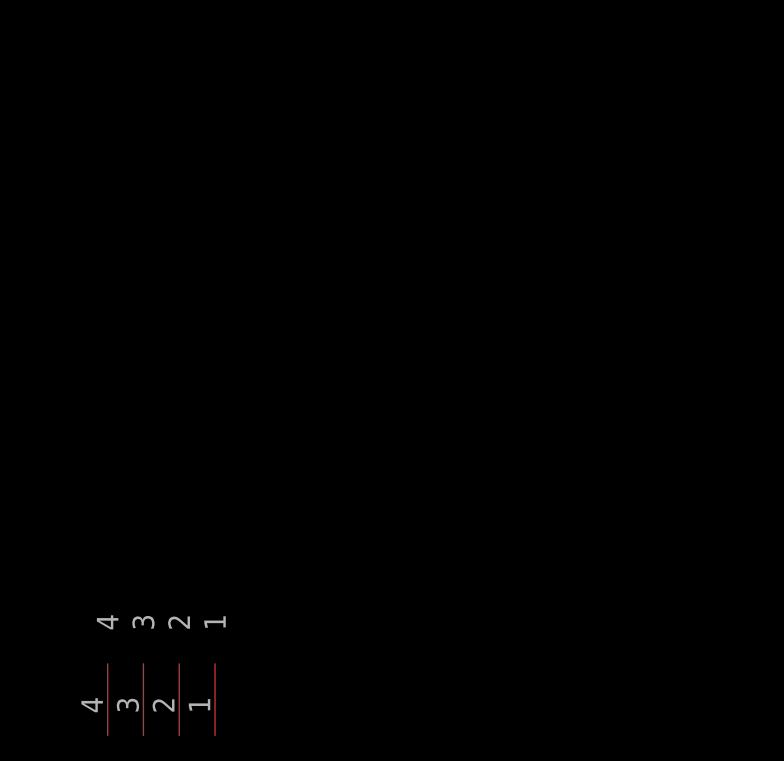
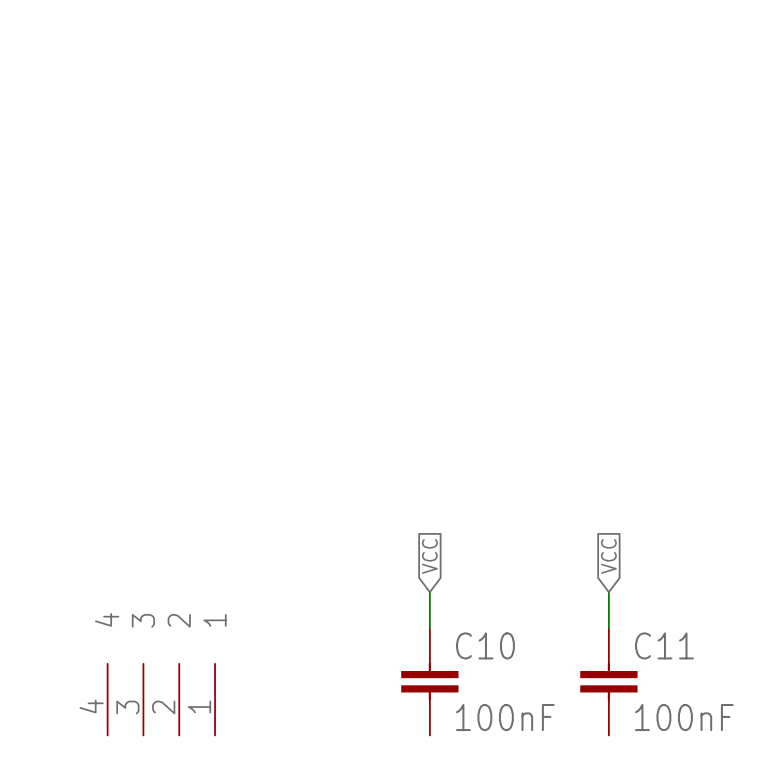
global label: none -> VCC (429, 556)
global label: none -> VCC (608, 556)
wire: none -> (429, 592) (429, 628)
wire: none -> (608, 592) (608, 628)
C10: none -> 100nF (429, 681)
C11: none -> 100nF (608, 681)

